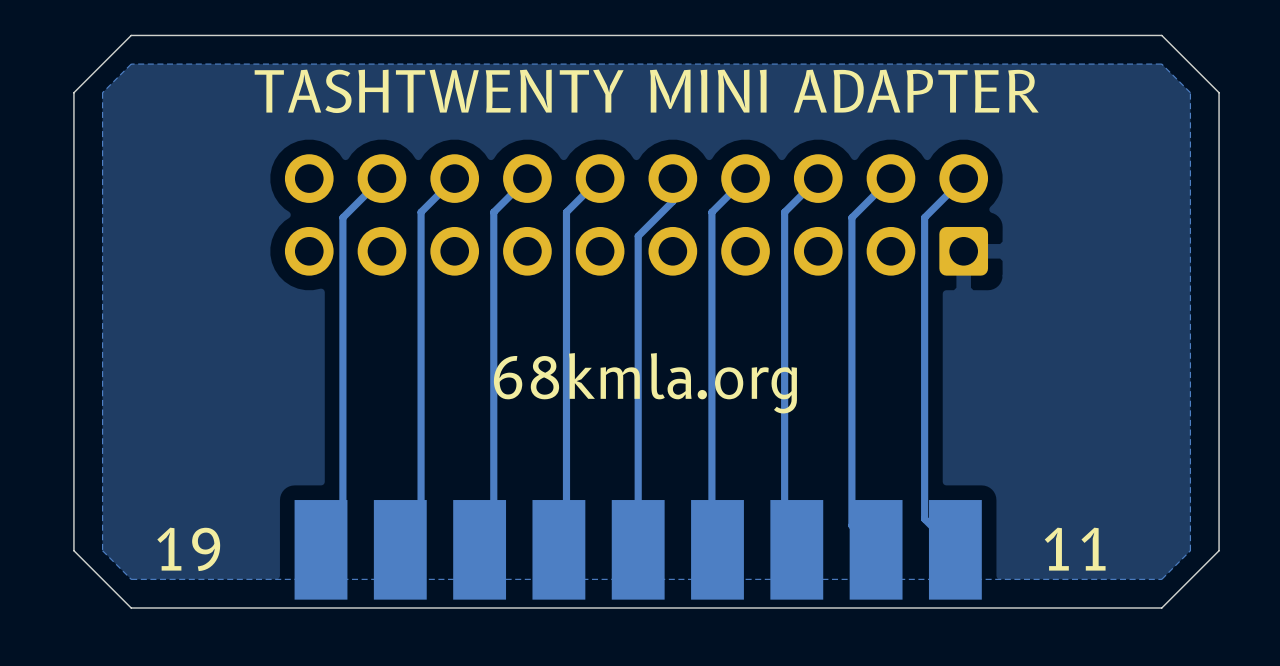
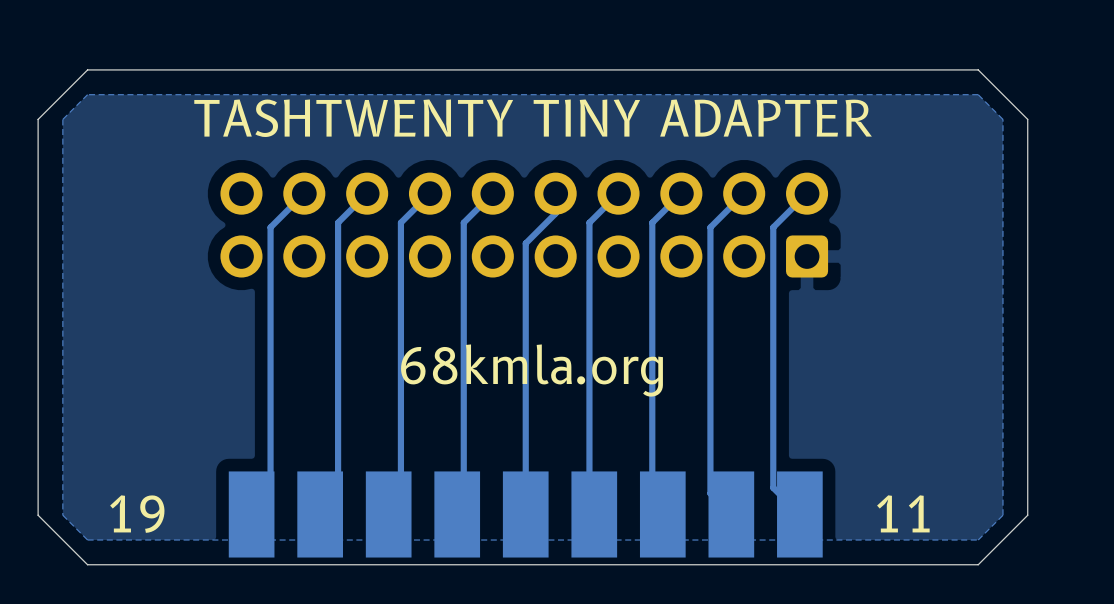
text: TASHTWENTY MINI ADAPTER (646, 91) -> TASHTWENTY TINY ADAPTER (533, 118)

